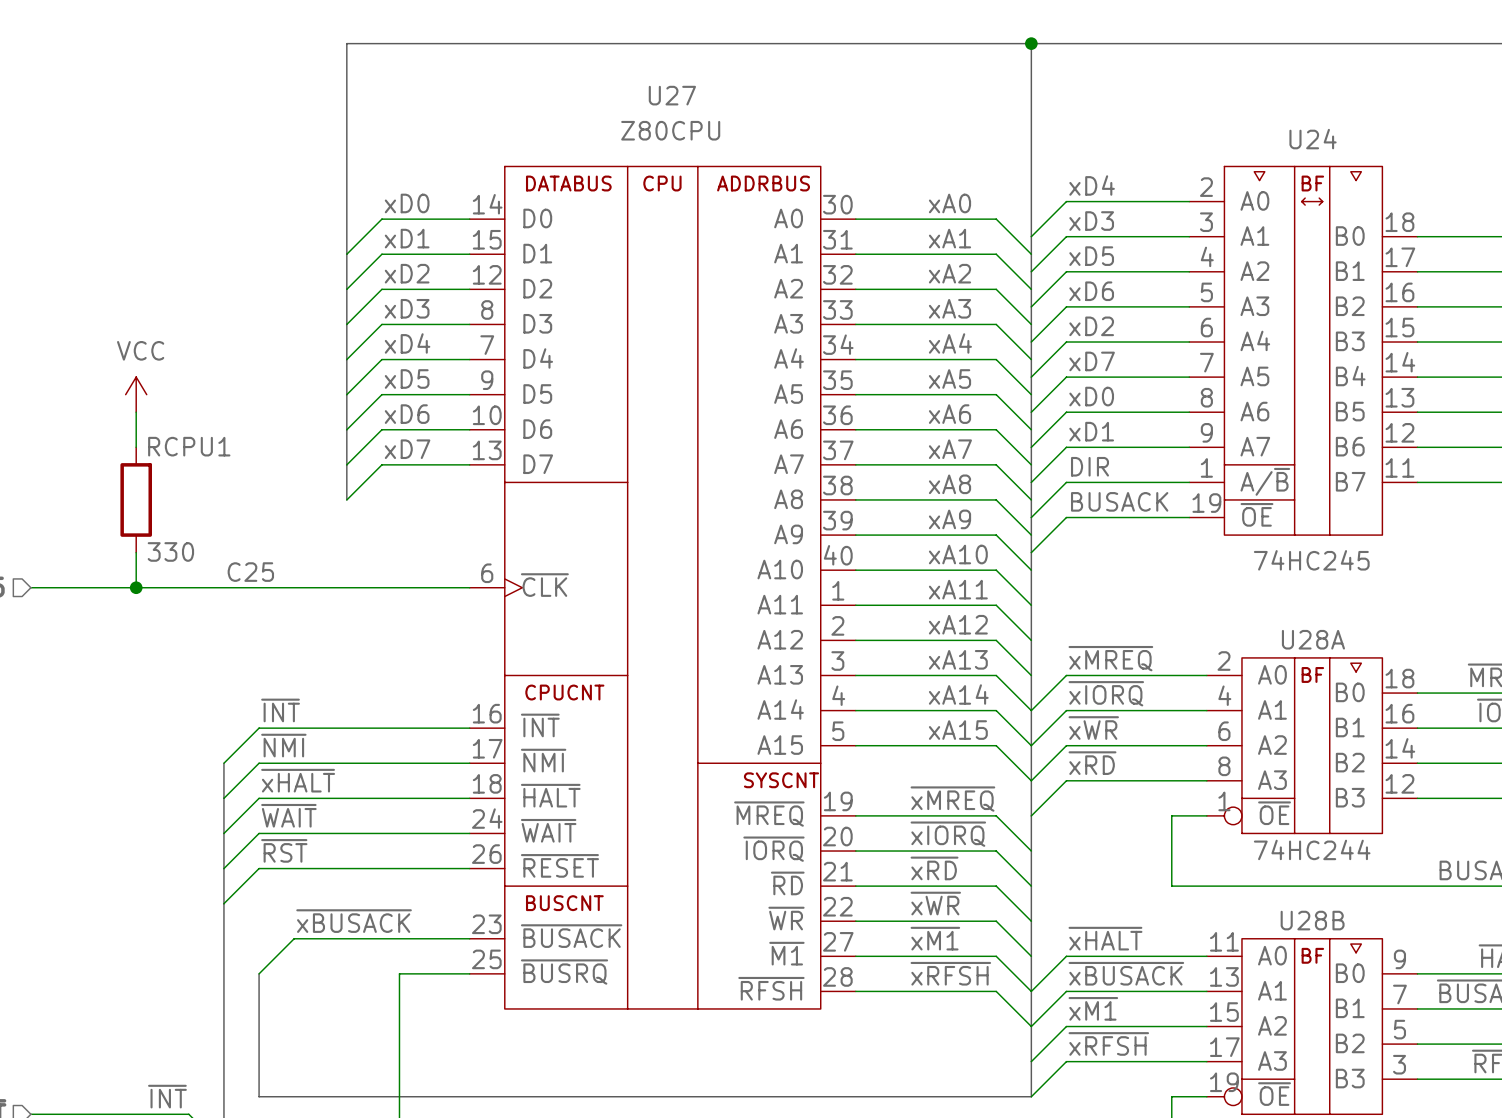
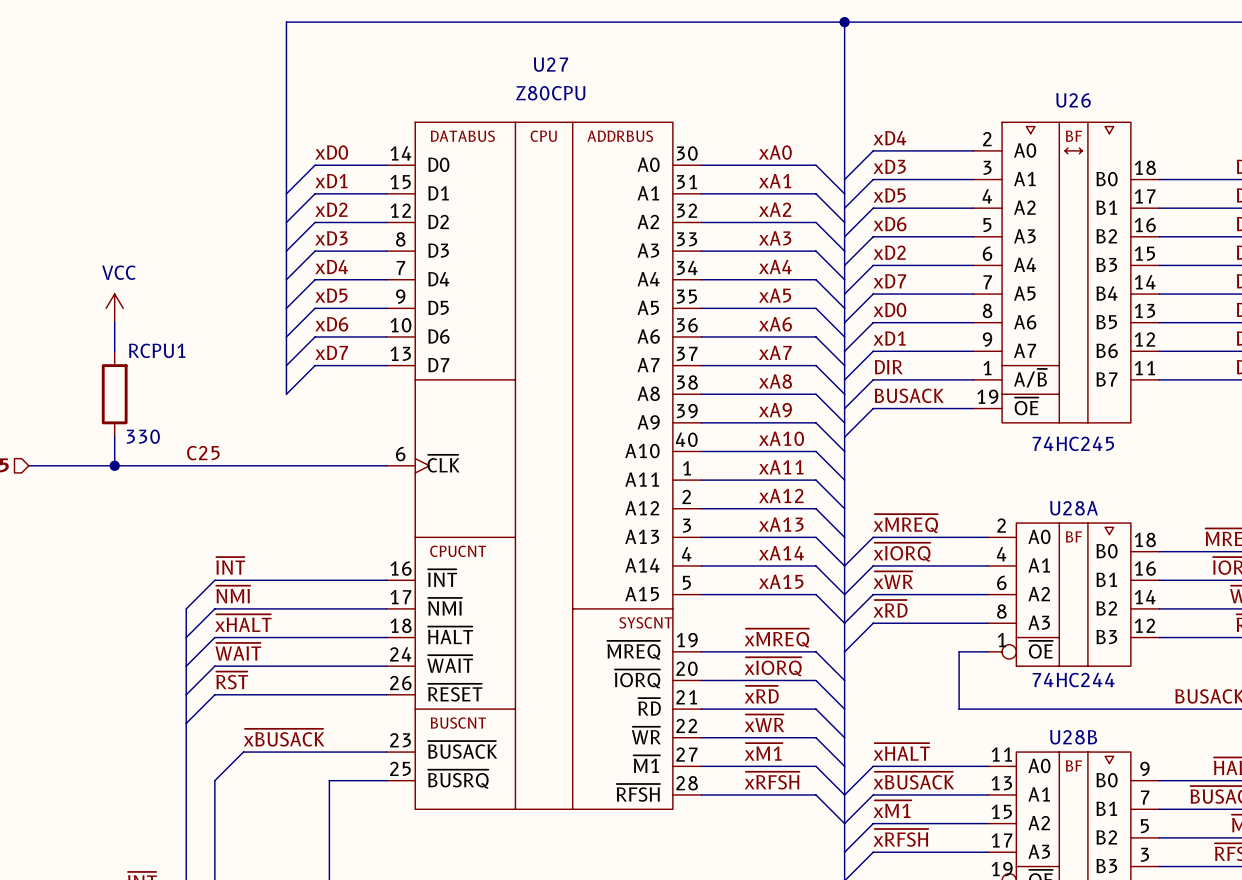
U24 name: U24 (1313, 139) -> U26 (1073, 100)

